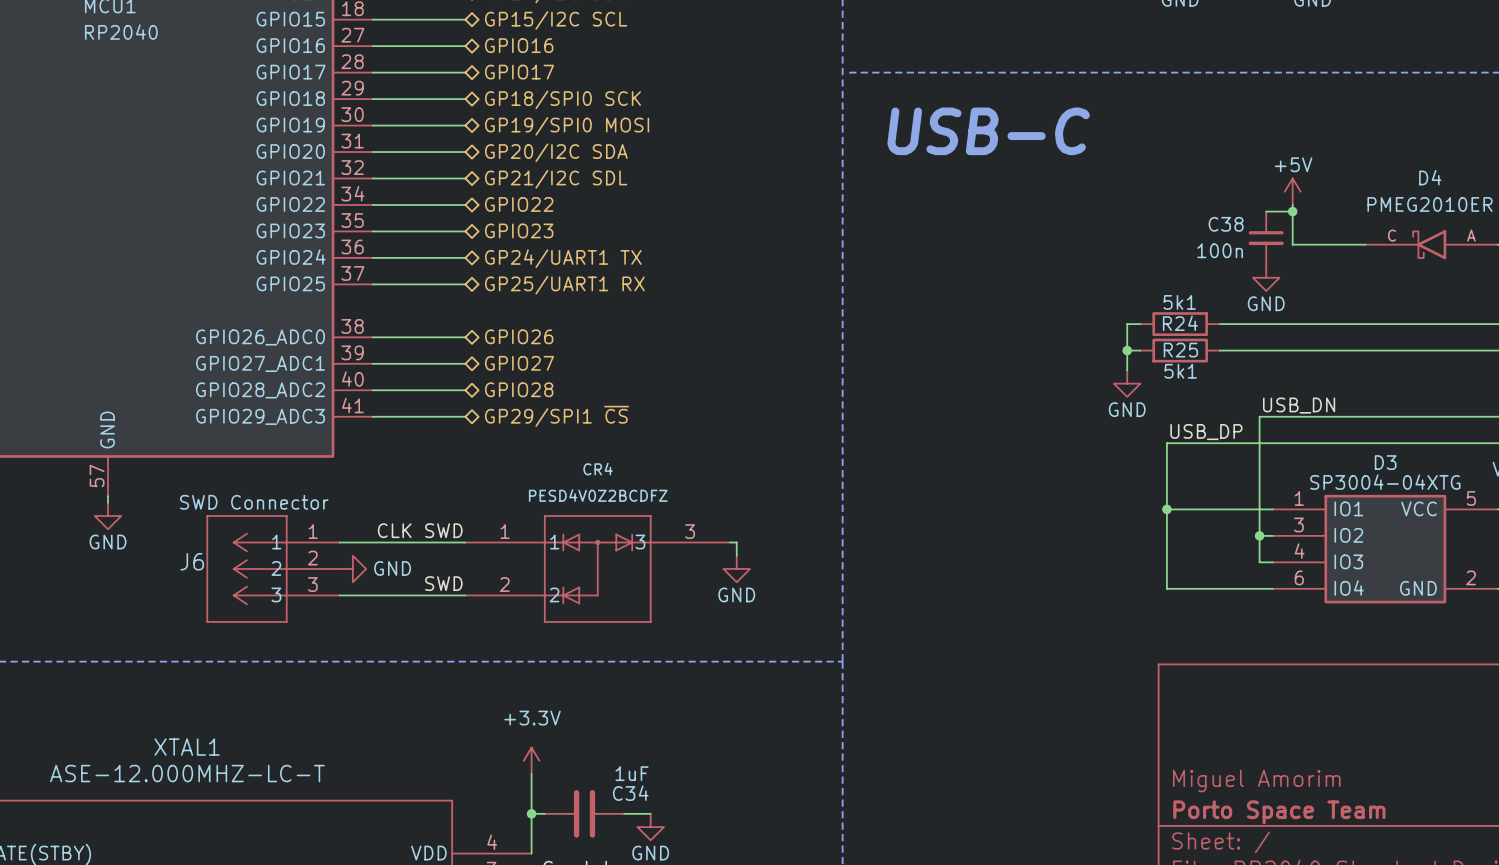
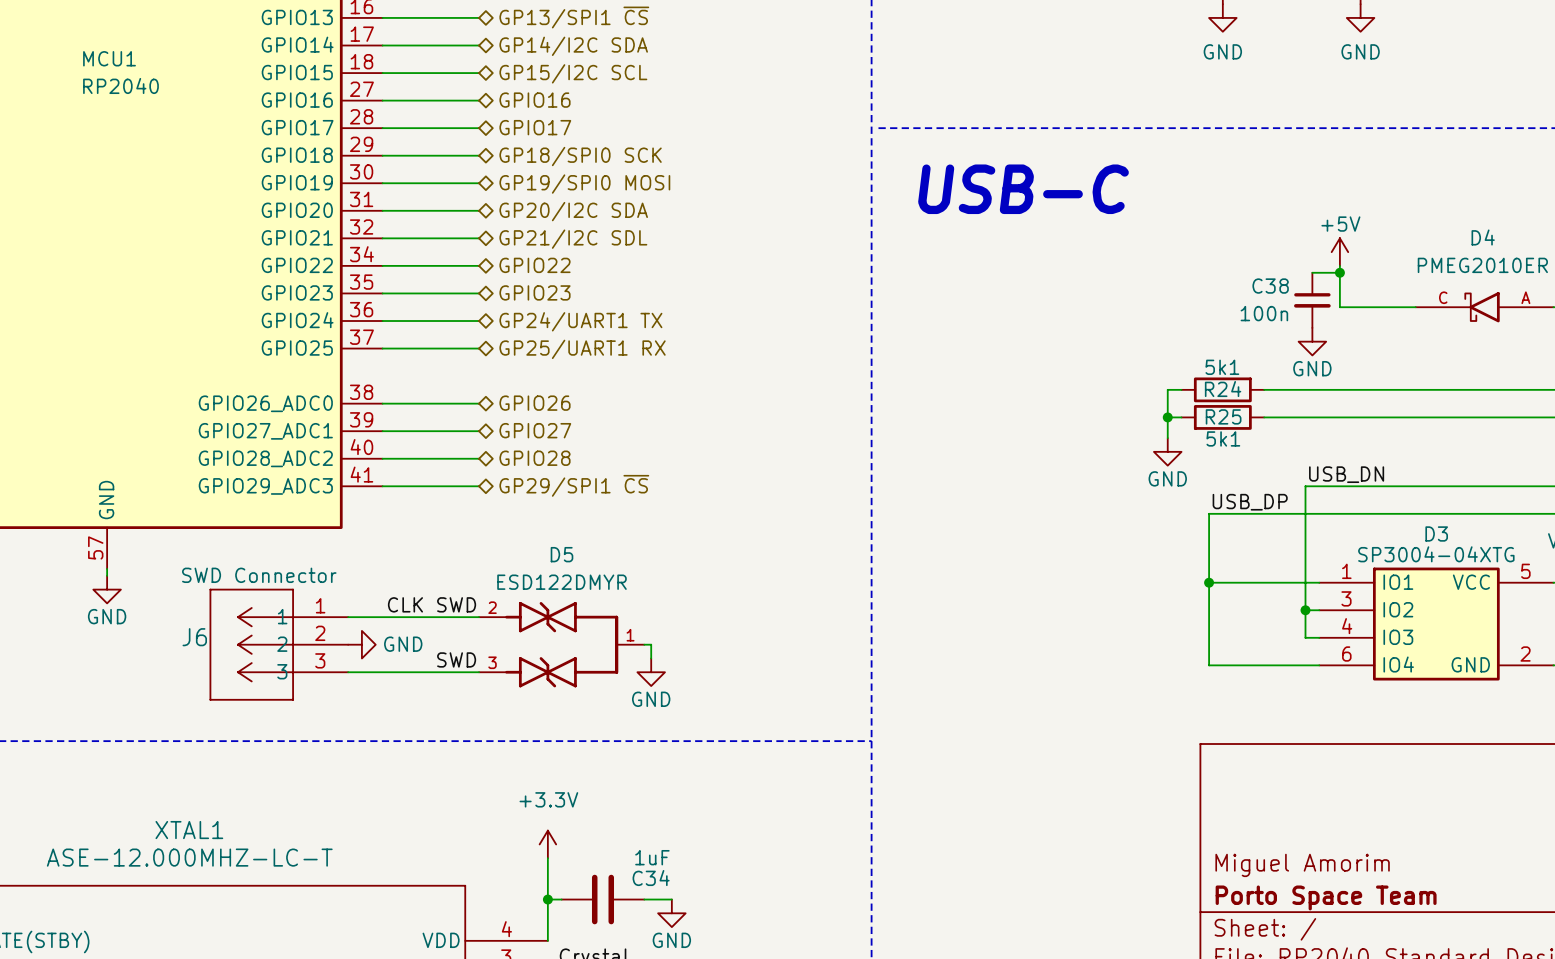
wire: (730, 542) (736, 542) (736, 555) -> (644, 644) (651, 644) (651, 658)
D5: none -> ESD122DMYR (561, 644)
CR4: PESD4V0Z2BCDFZ (597, 568) -> none
power symbol position: GND (736, 568) -> GND (651, 672)

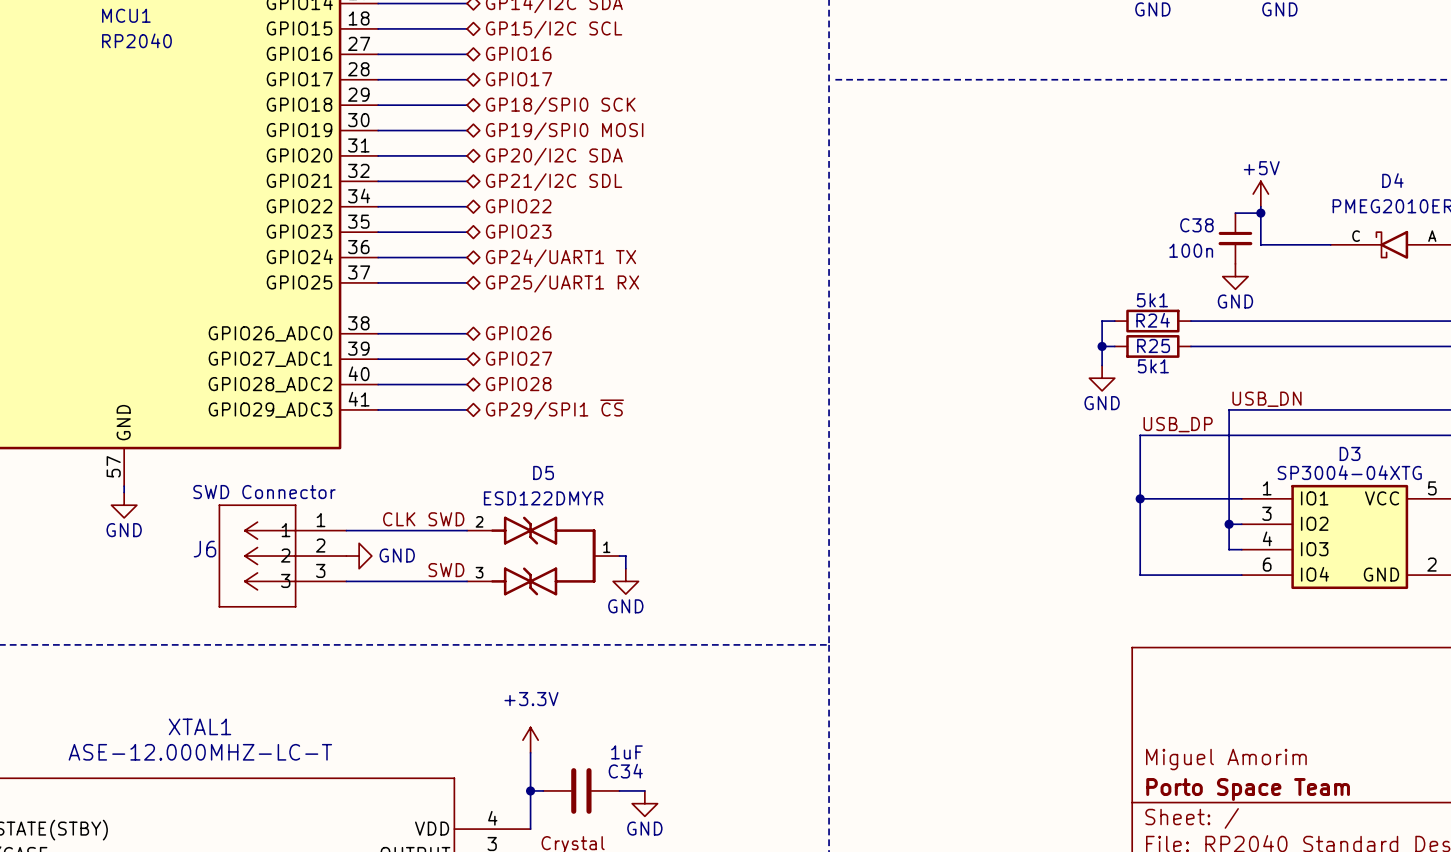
text: USB-C (1023, 189) -> none

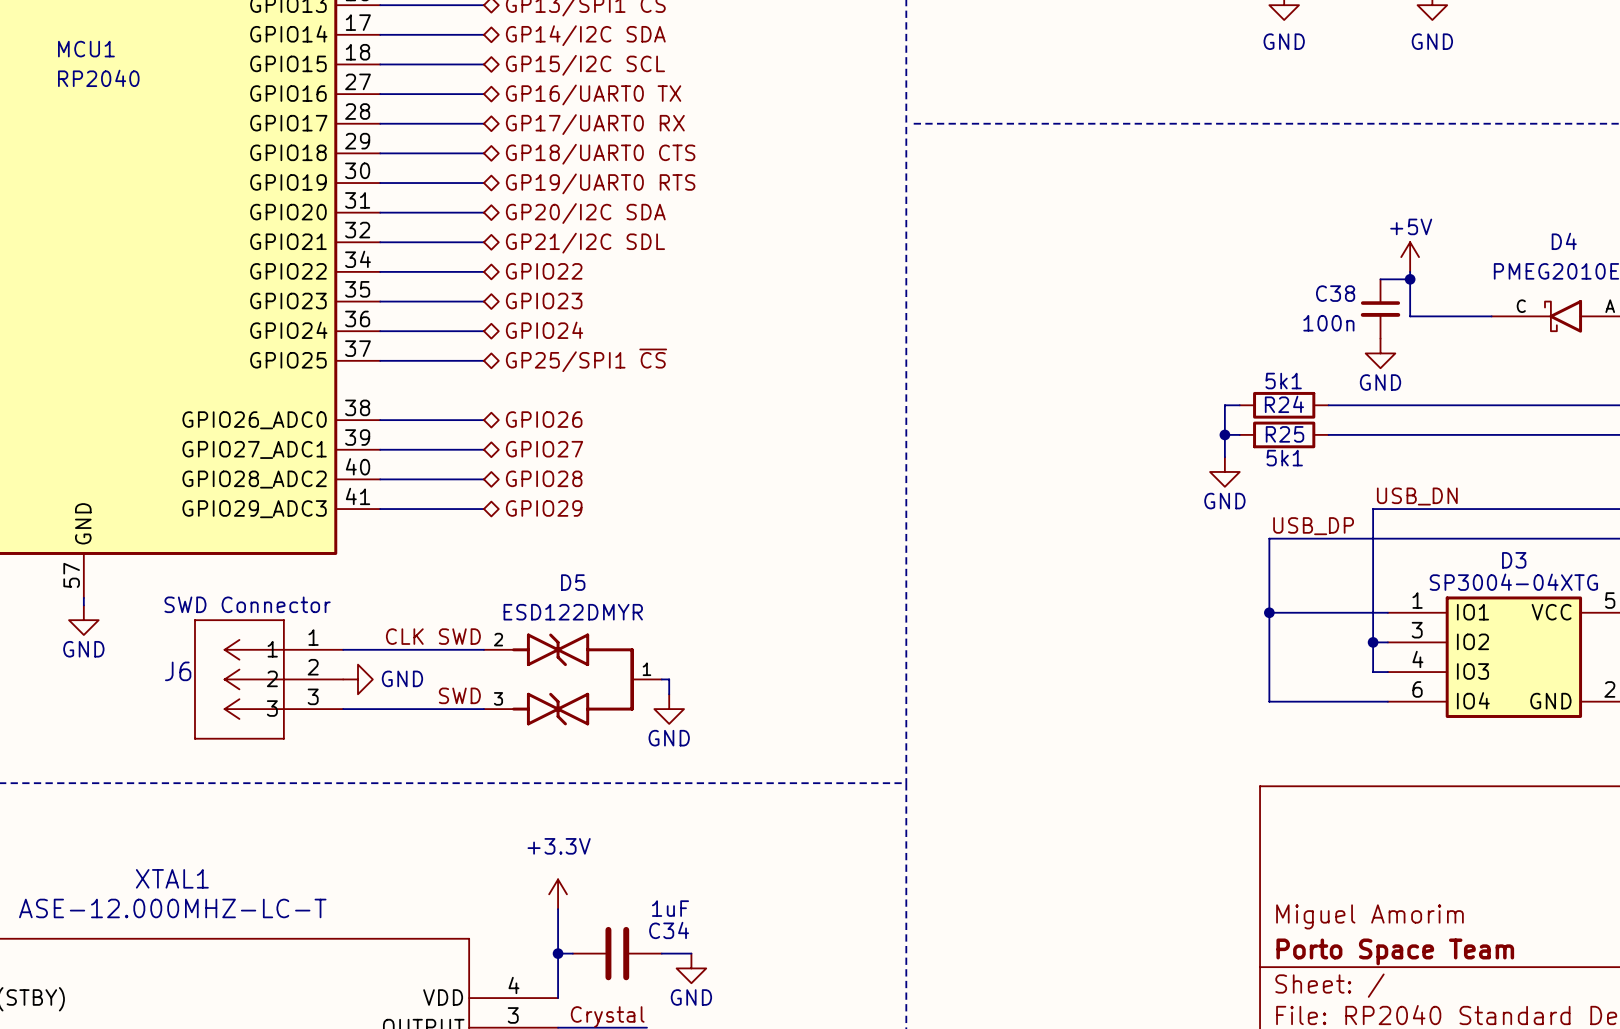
hierarchical label: GPIO16 (518, 53) -> GP16/UART0 TX (593, 94)
hierarchical label: GPIO17 (518, 79) -> GP17/UART0 RX (595, 124)
hierarchical label: GP18/SPI0 SCK (560, 105) -> GP18/UART0 CTS (600, 154)
hierarchical label: GP19/SPI0 MOSI (564, 131) -> GP19/UART0 RTS (600, 183)
hierarchical label: GP24/UART1 TX (561, 258) -> GPIO24 (544, 330)
hierarchical label: GP25/UART1 RX (562, 283) -> GP25/SPI1 ~{CS} (586, 360)
hierarchical label: GP29/SPI1 ~{CS} (554, 409) -> GPIO29 (544, 508)

